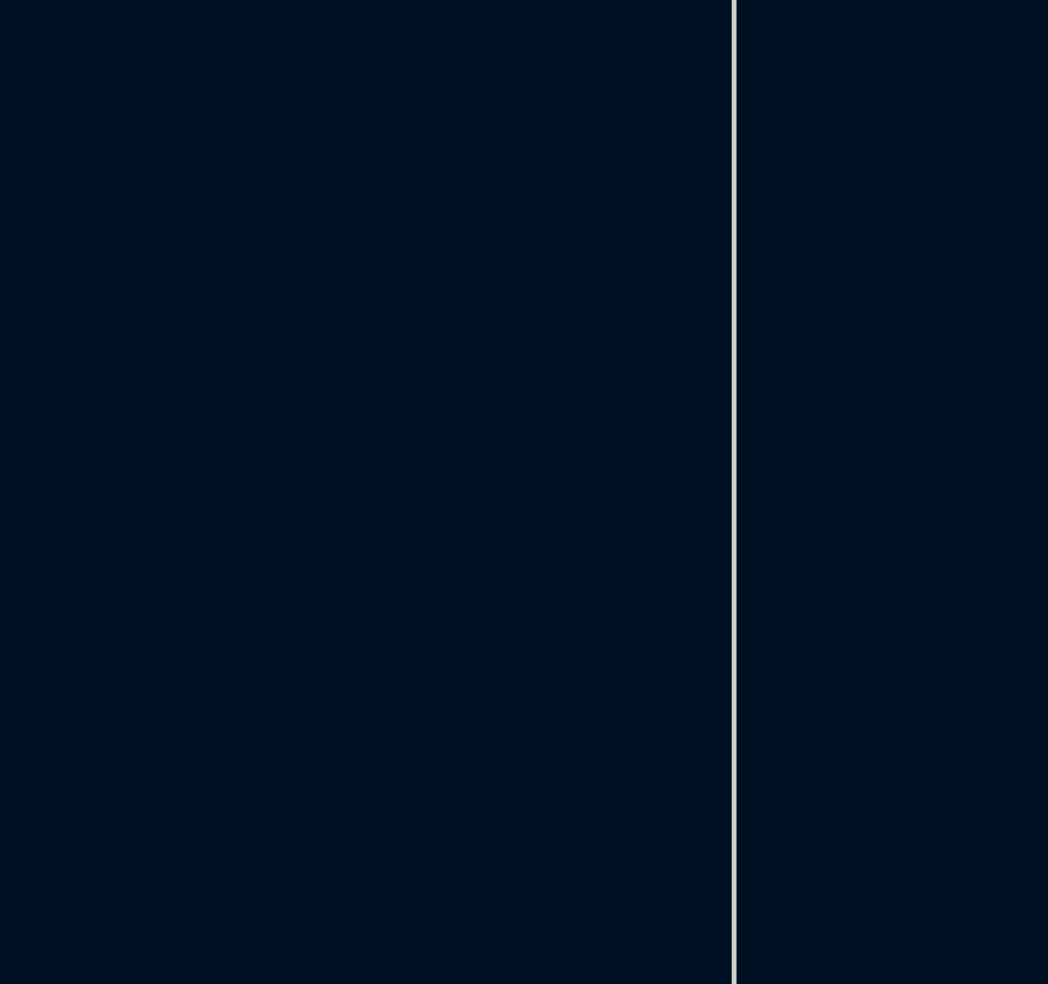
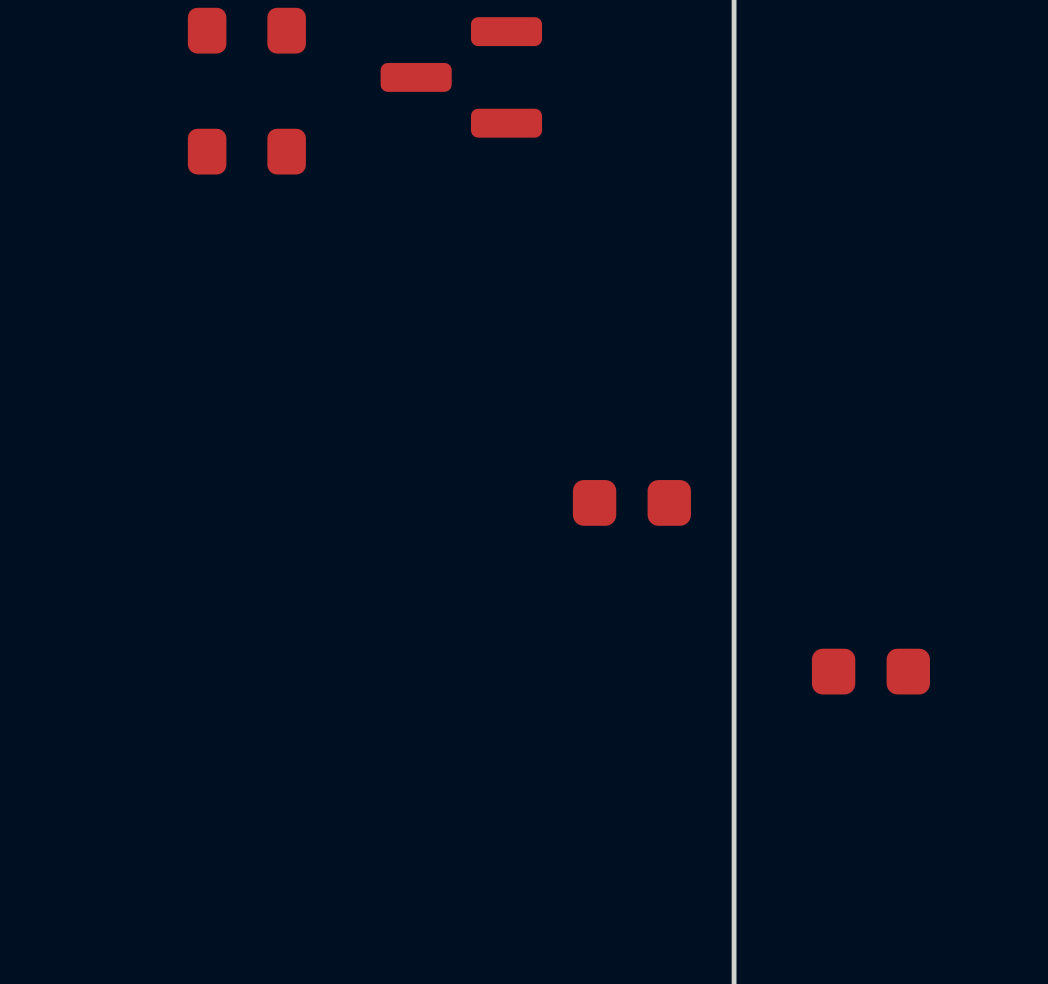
part: none -> (246, 30)
part: none -> (461, 77)
part: none -> (246, 151)
part: none -> (631, 502)
part: none -> (870, 671)

